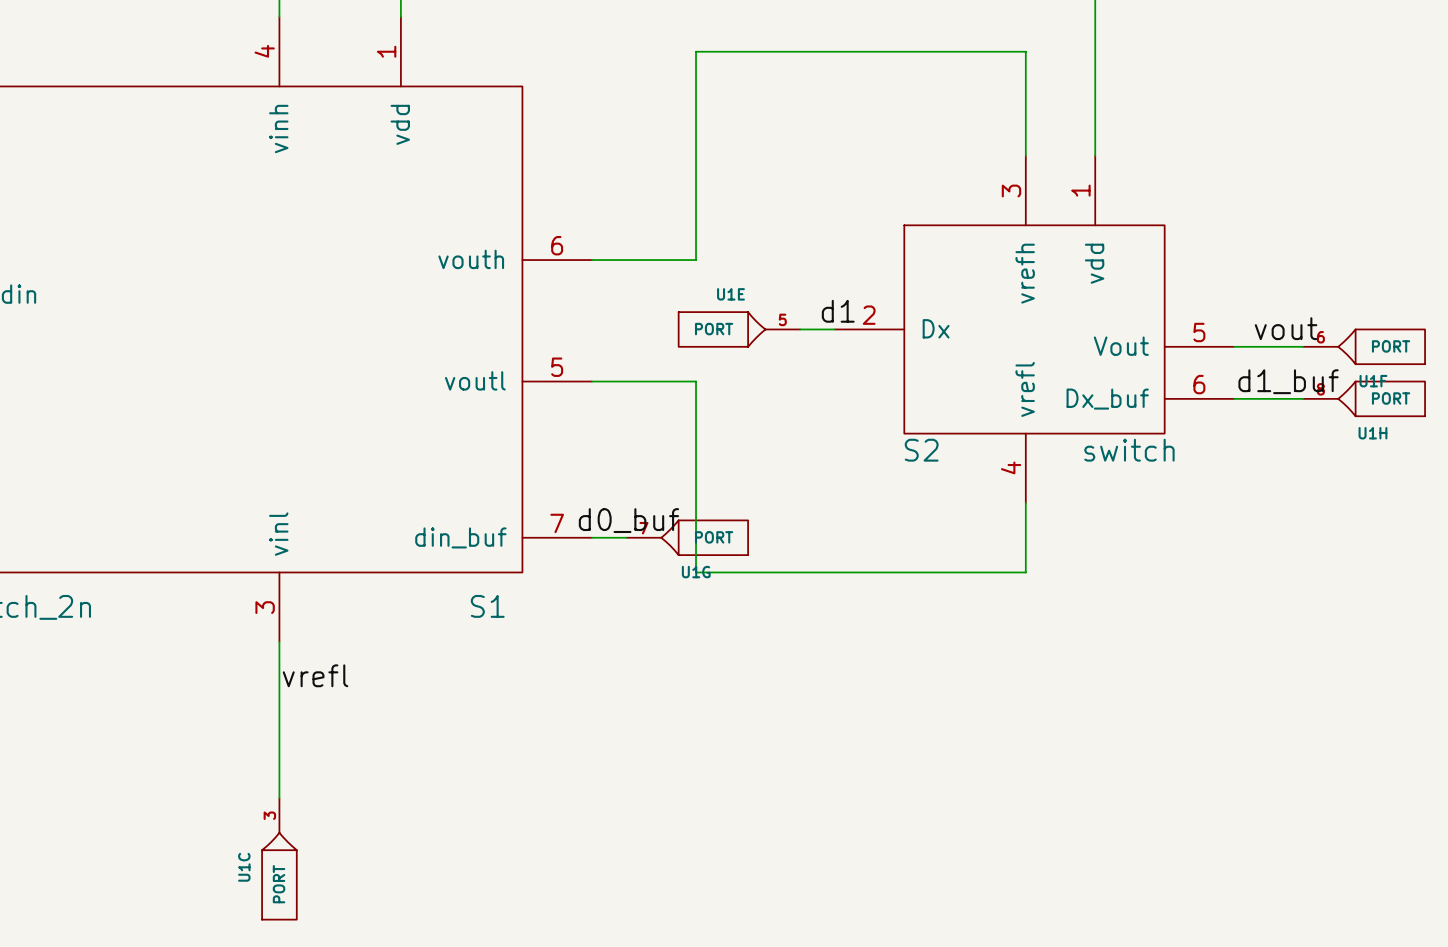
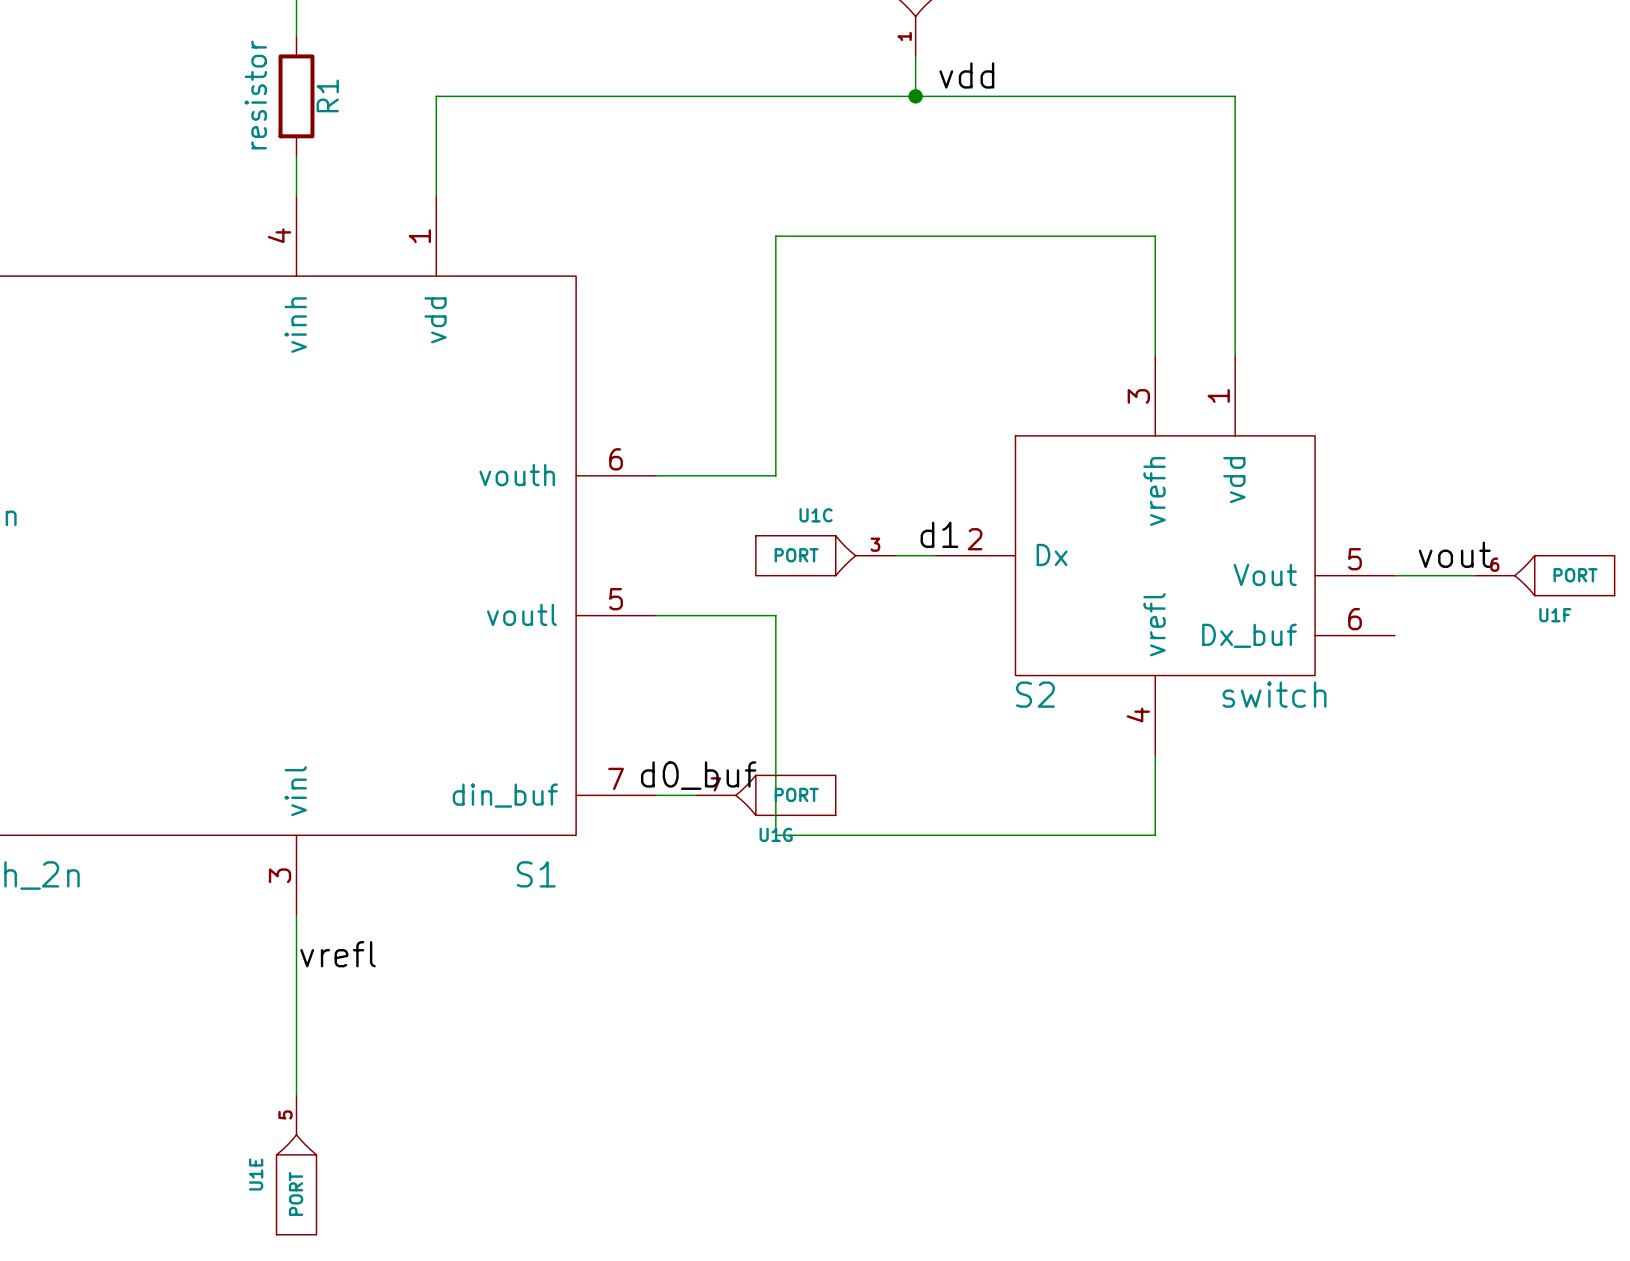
U1E rotation: 0° (722, 329) -> 90° counterclockwise (296, 1184)
U1E position: (739, 329) -> (296, 1164)
label: d1_buf (1288, 381) -> none
wire: (1234, 398) (1303, 398) -> none
U1H: PORT (1364, 398) -> none
U1C position: (279, 858) -> (825, 555)
U1C rotation: 0° (279, 876) -> 90° clockwise (805, 555)

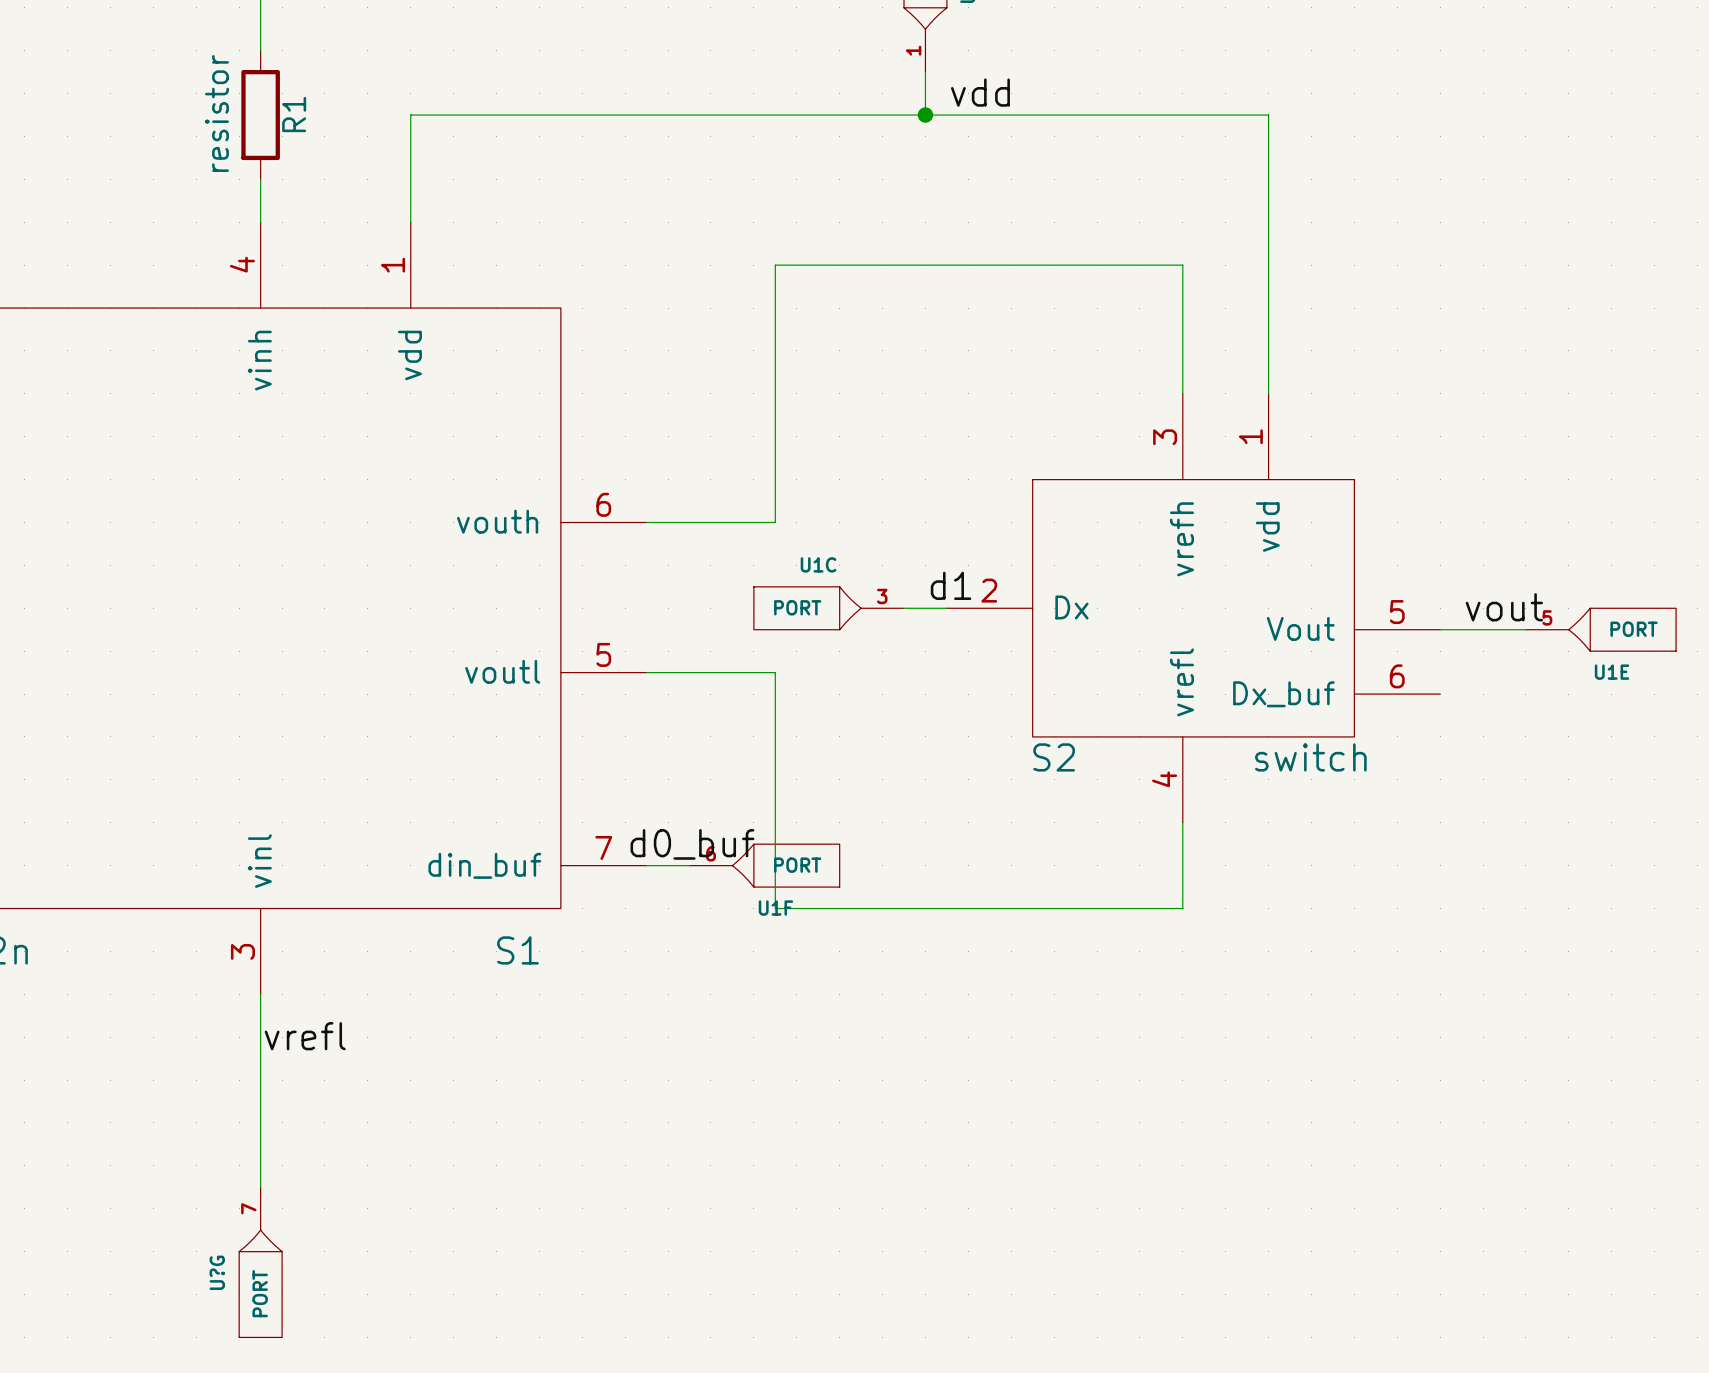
U1F position: (1544, 575) -> (764, 865)
U1G: PORT (765, 795) -> none
U1E position: (296, 1164) -> (1600, 629)
U?G: none -> PORT (260, 1262)
U1E rotation: 0° (296, 1184) -> 90° counterclockwise (1622, 629)

